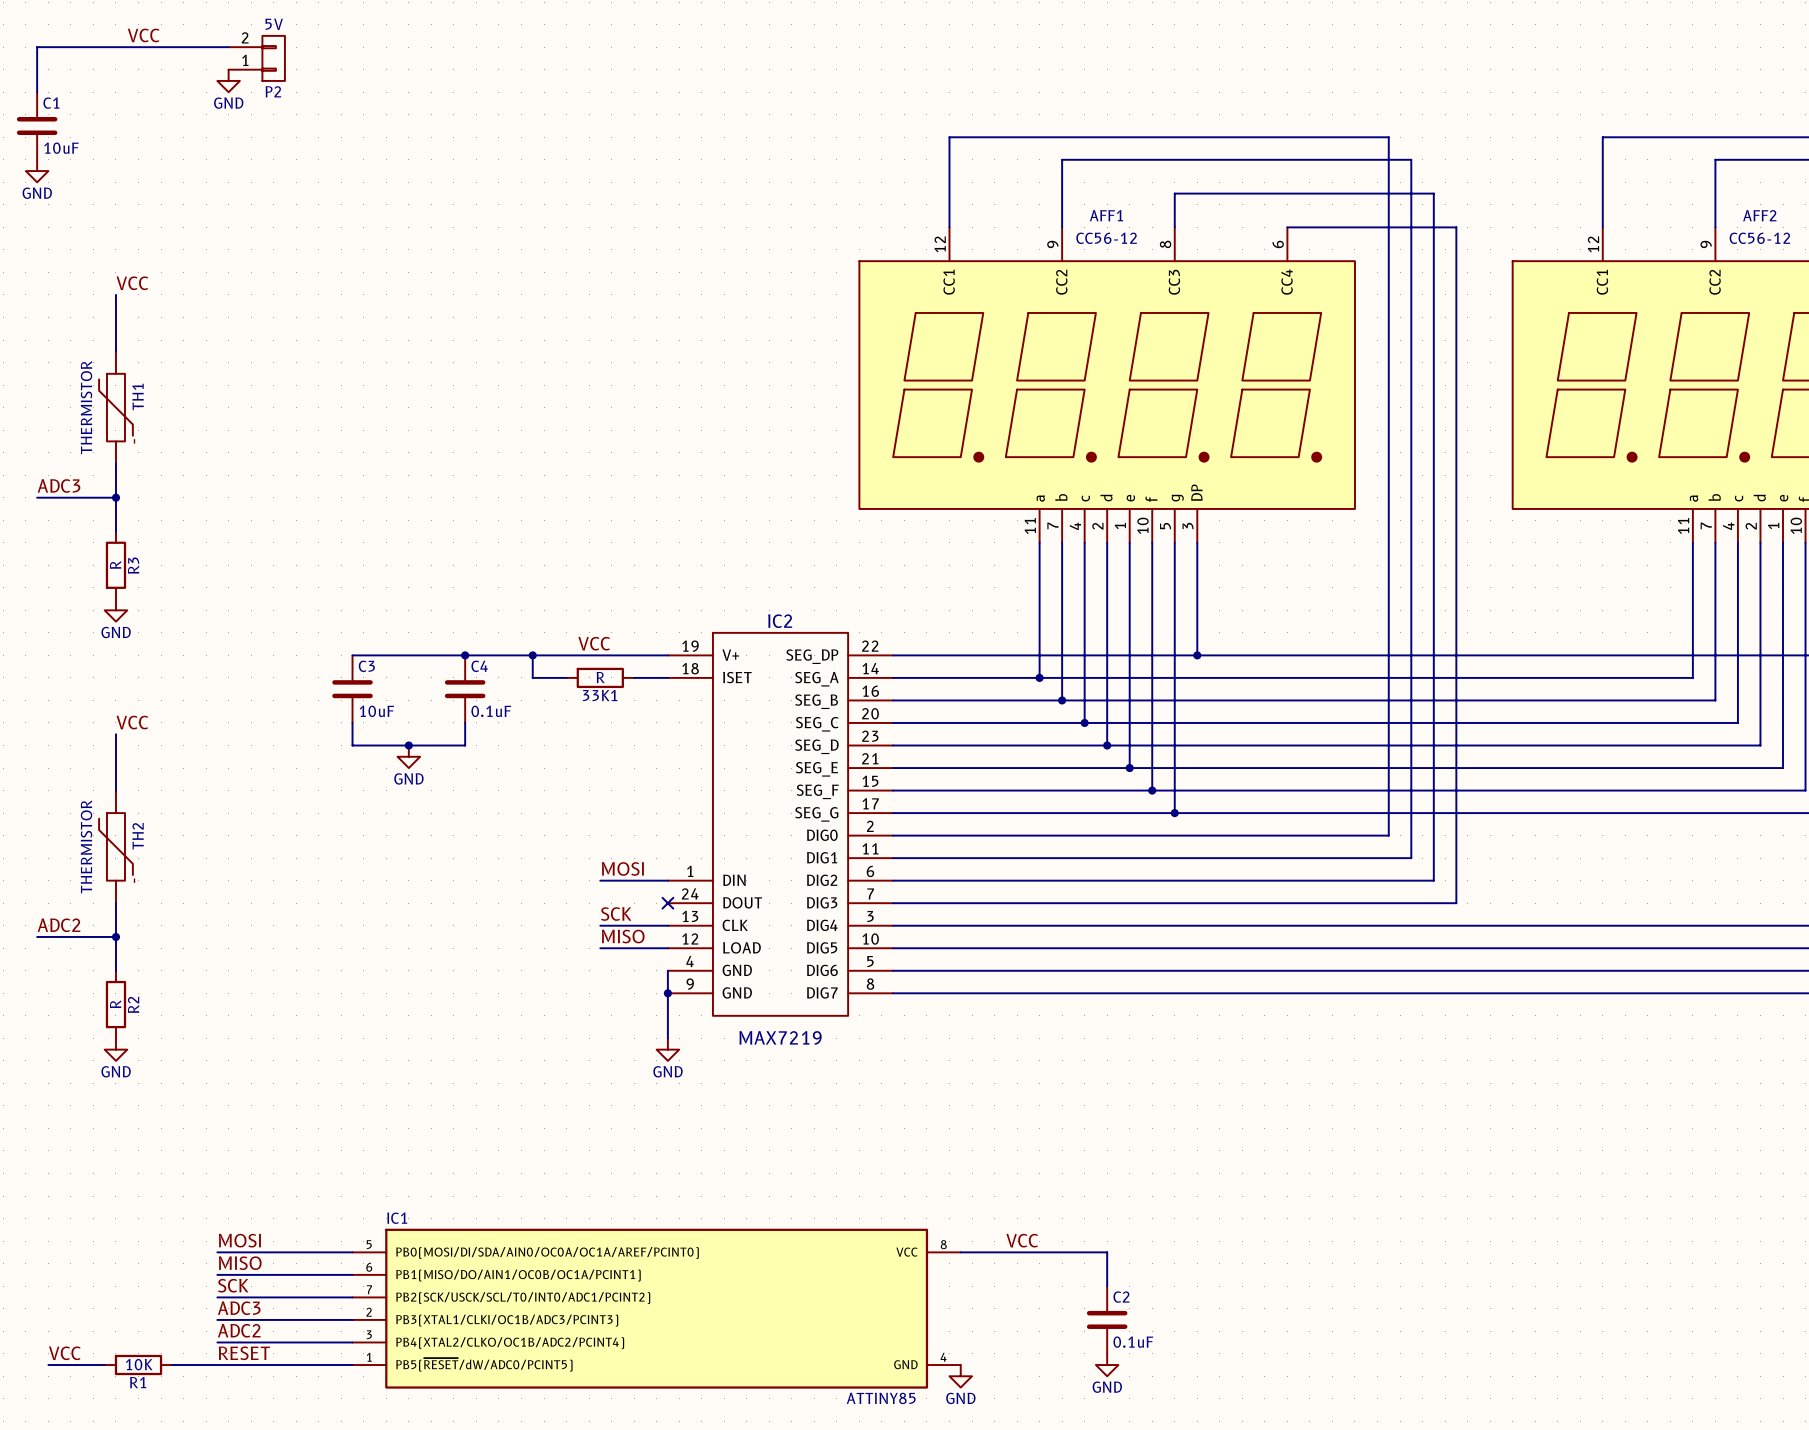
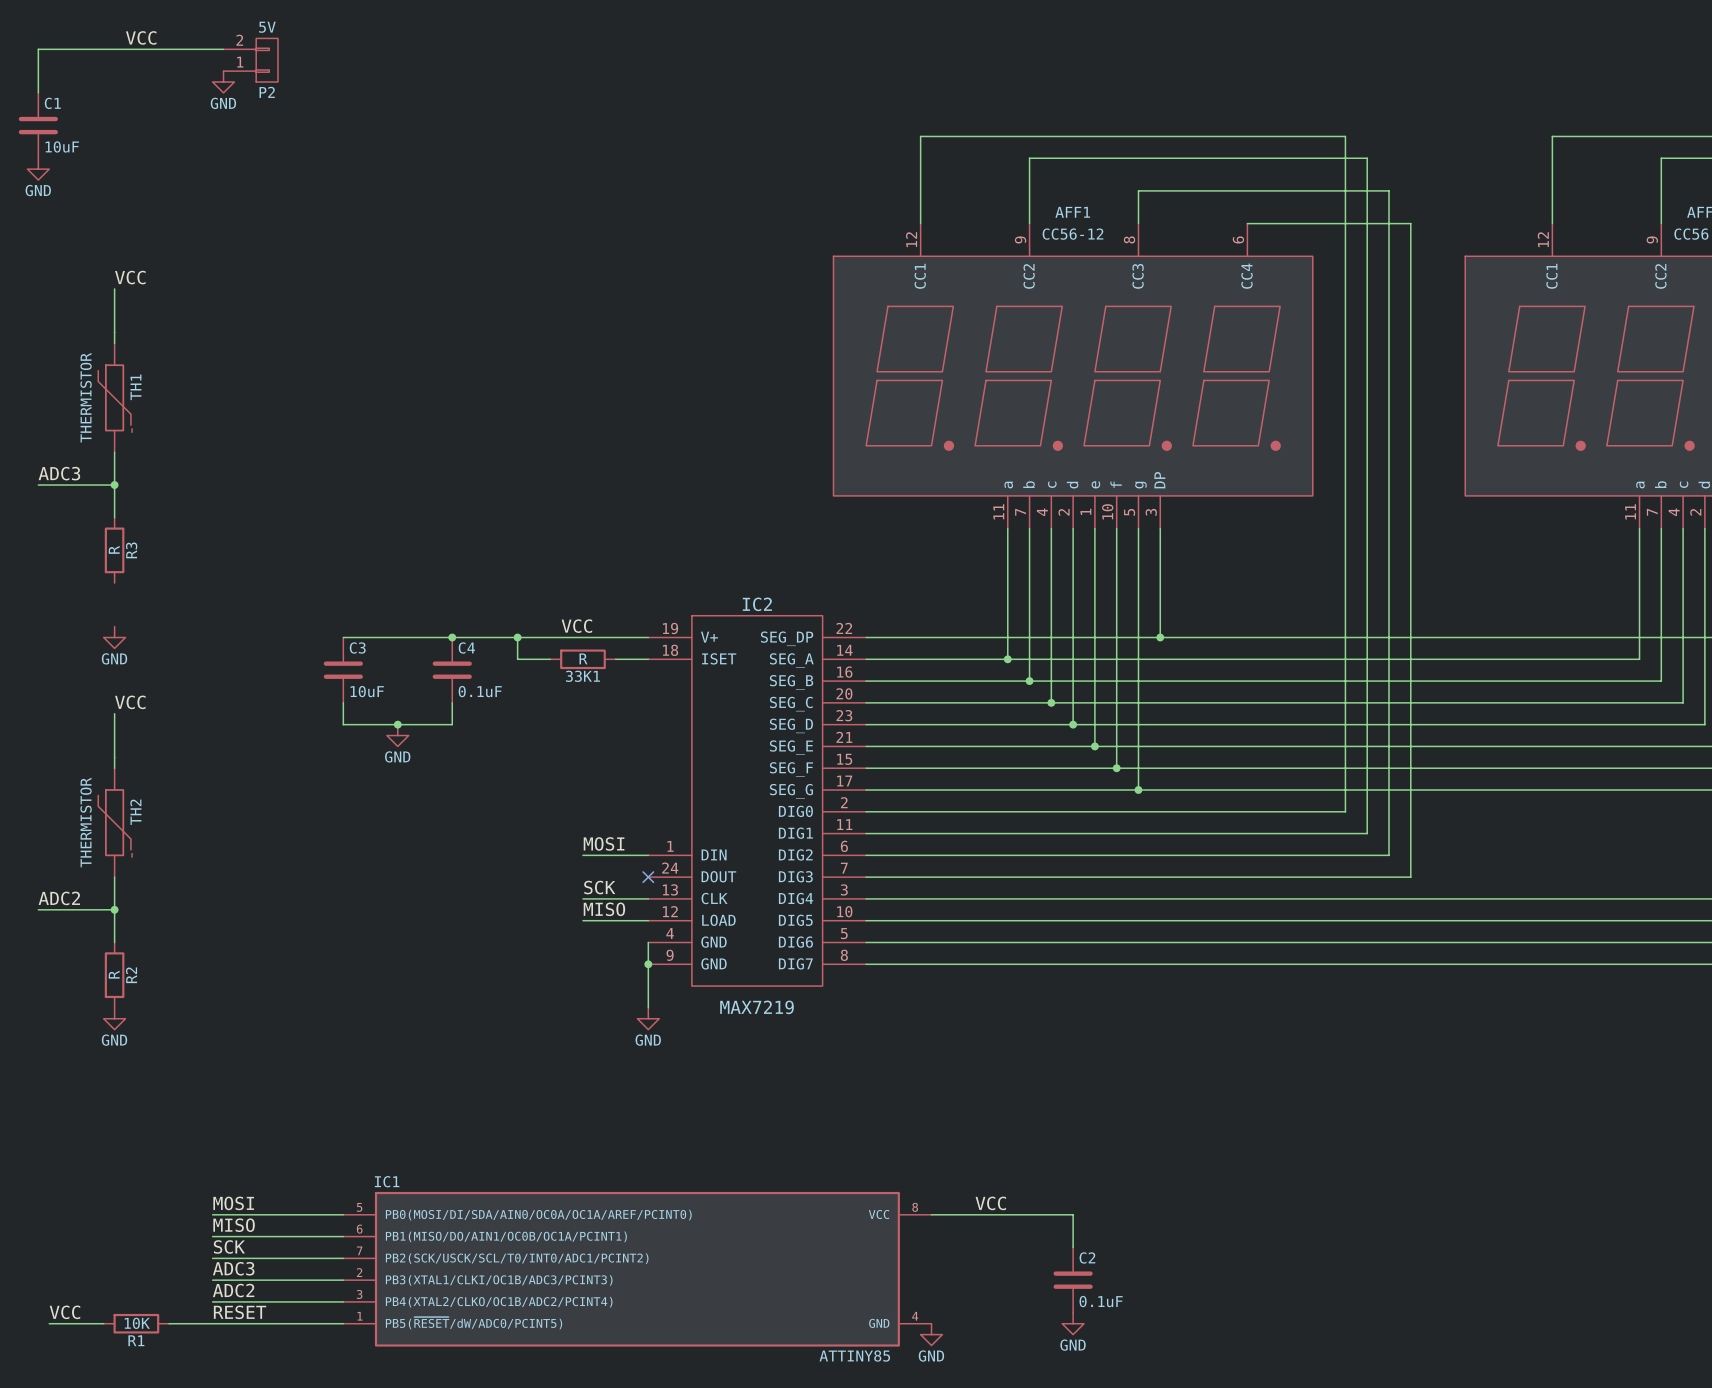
power symbol position: GND (115, 610) -> GND (114, 637)

